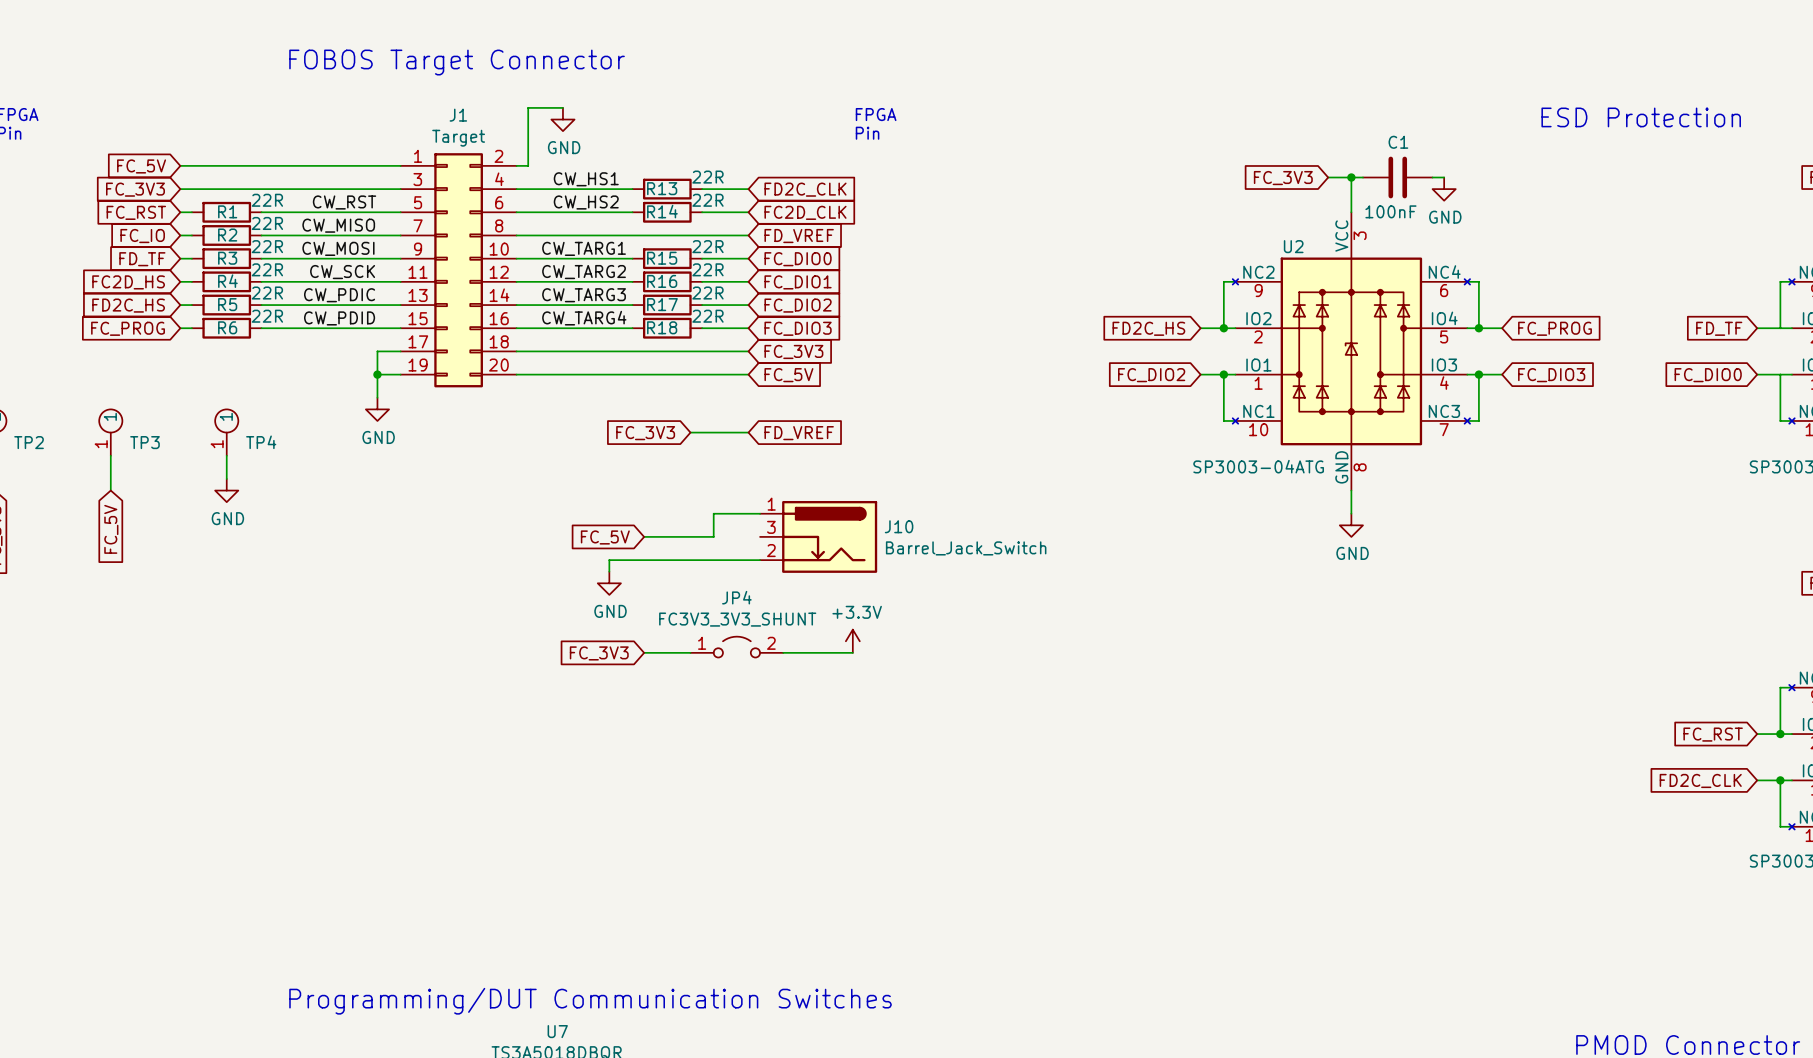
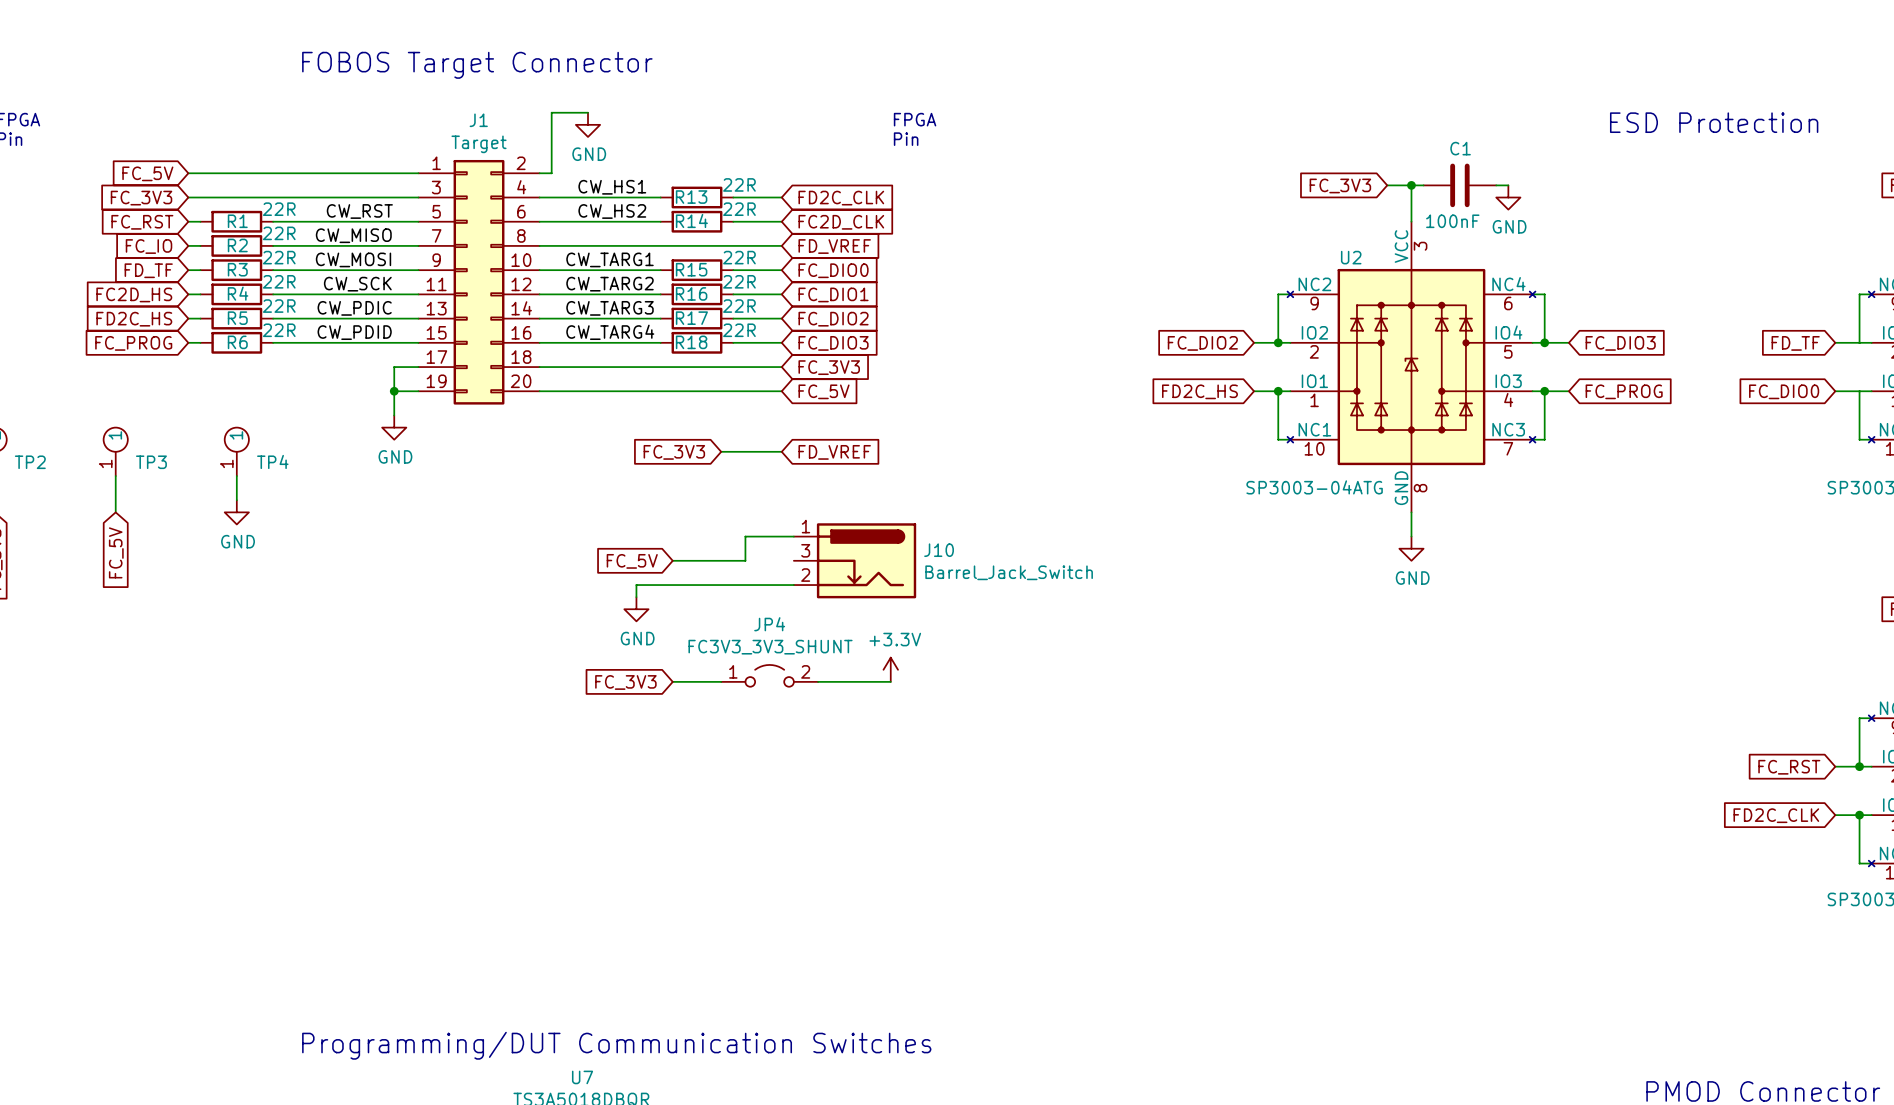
global label: FD2C_HS (1148, 328) -> FC_DIO2 (1202, 343)
global label: FC_PROG (1555, 328) -> FC_DIO3 (1620, 343)
global label: FC_DIO2 (1151, 375) -> FD2C_HS (1199, 391)
global label: FC_DIO3 (1551, 375) -> FC_PROG (1624, 391)

